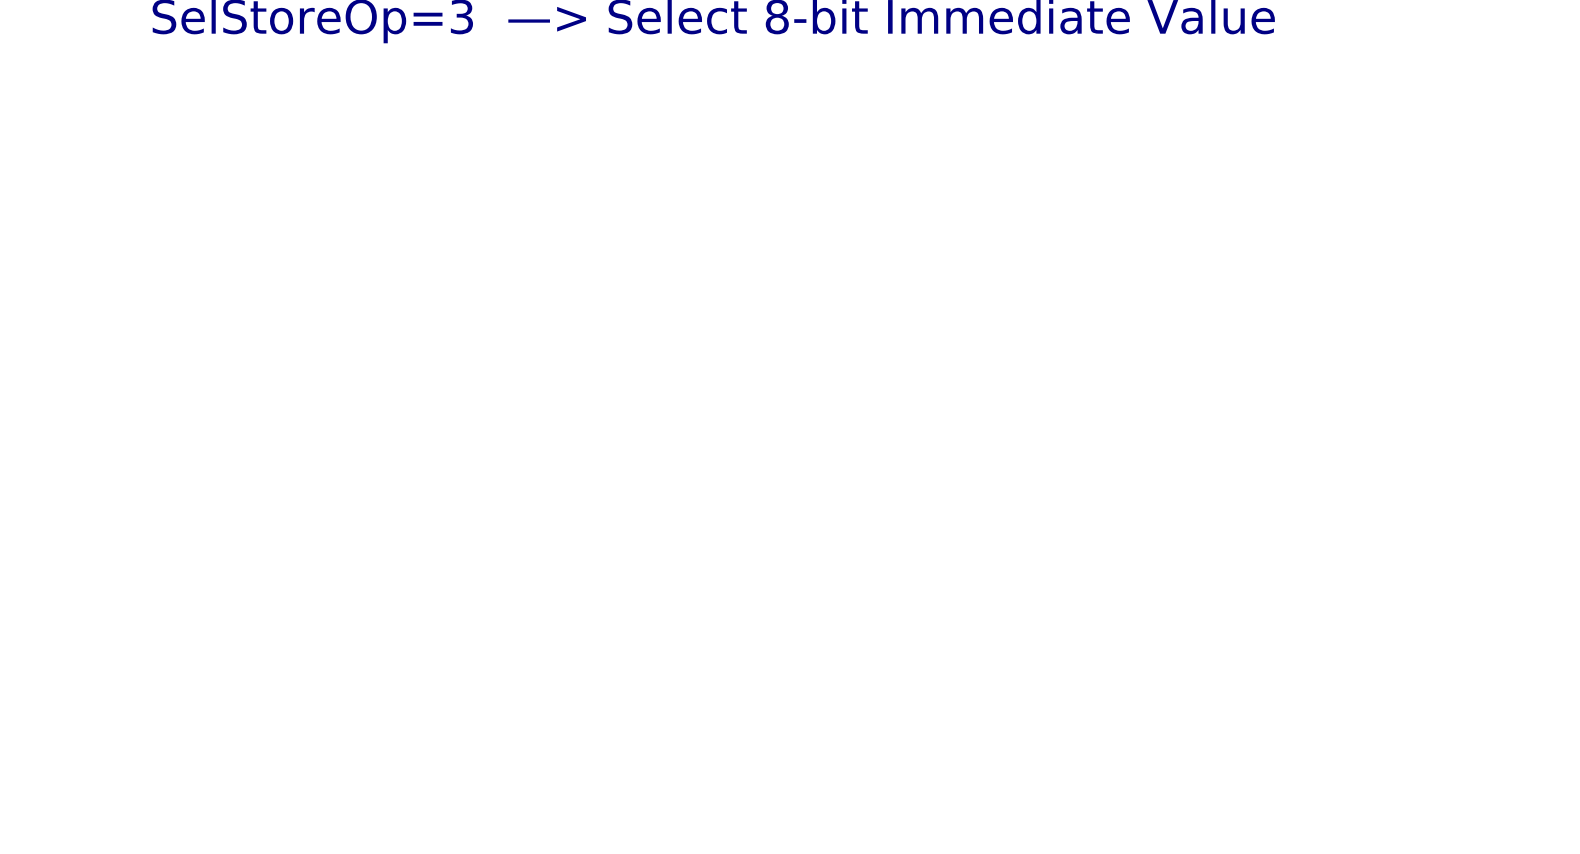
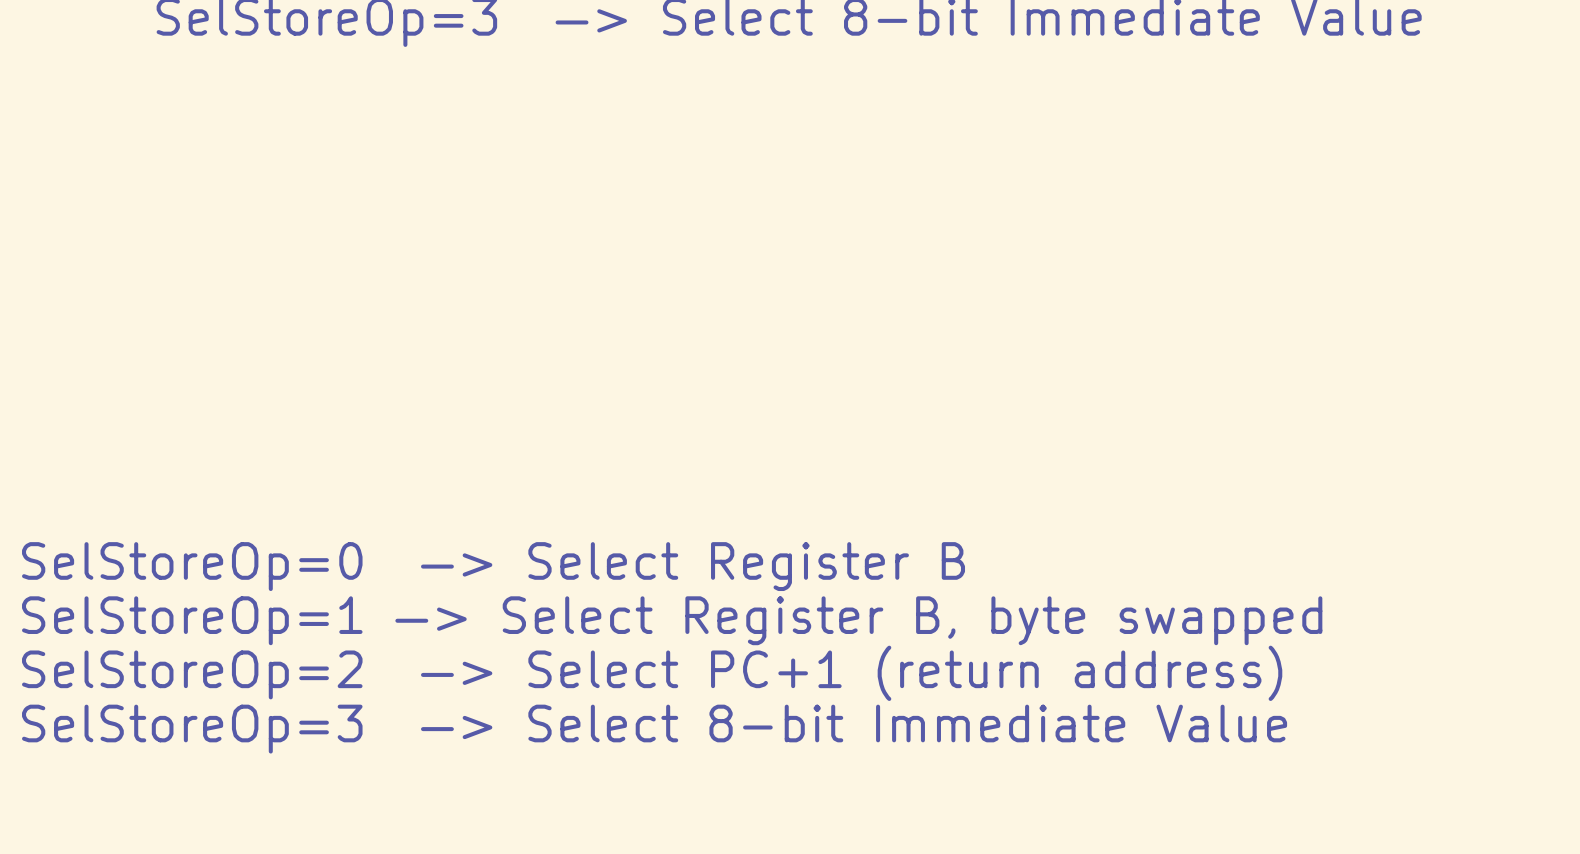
text: none -> SelStoreOp=0 —> Select Register B (493, 566)
text: none -> SelStoreOp=1 —> Select Register B, byte swapped (672, 620)
text: none -> SelStoreOp=2 —> Select PC+1 (return address) (652, 673)
text: none -> SelStoreOp=3 —> Select 8-bit Immediate Value (654, 729)

